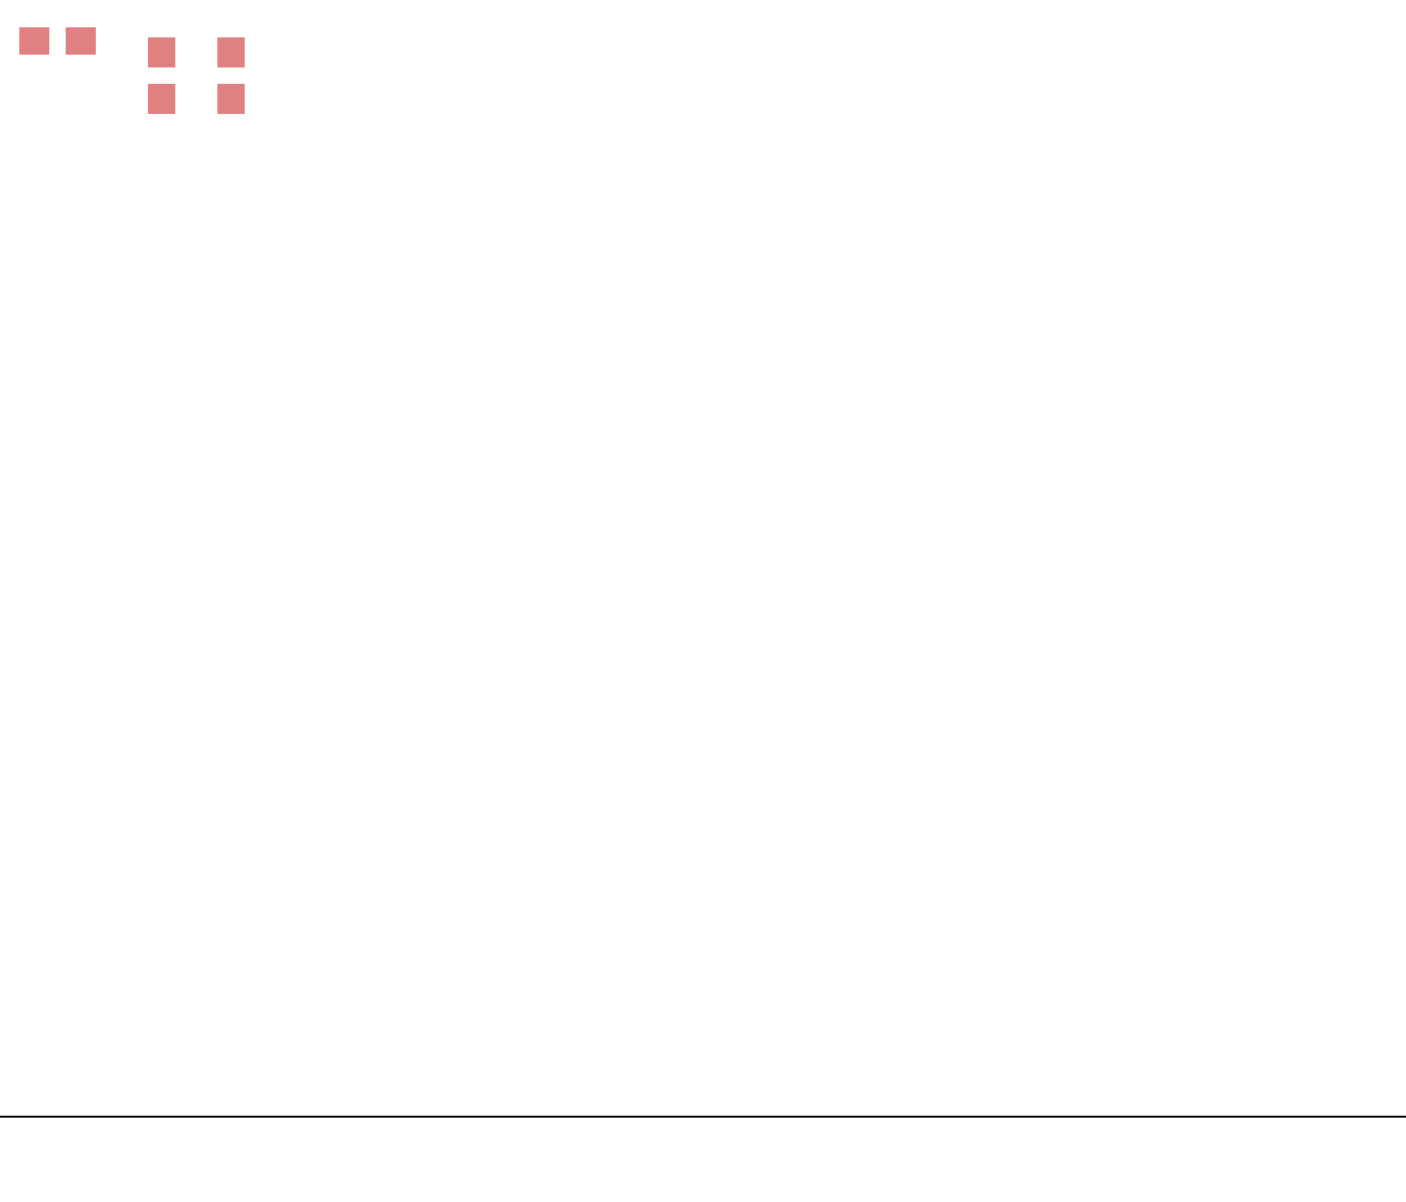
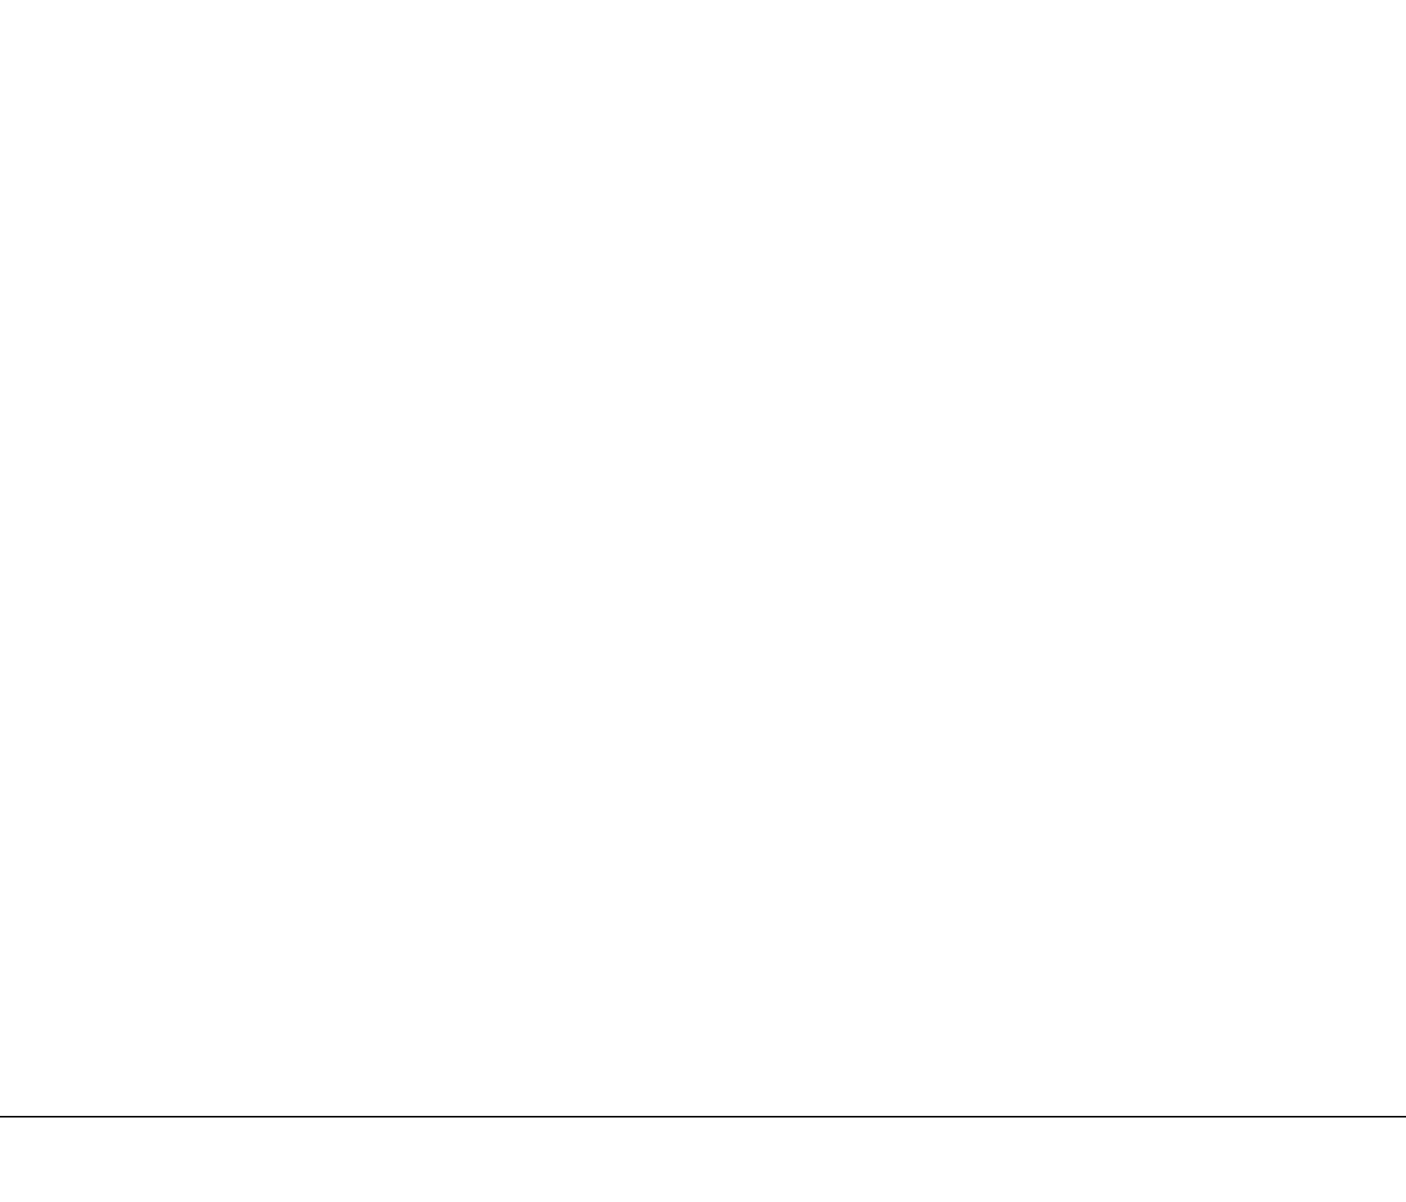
part: (57, 40) -> none
part: (161, 75) -> none
part: (231, 75) -> none

